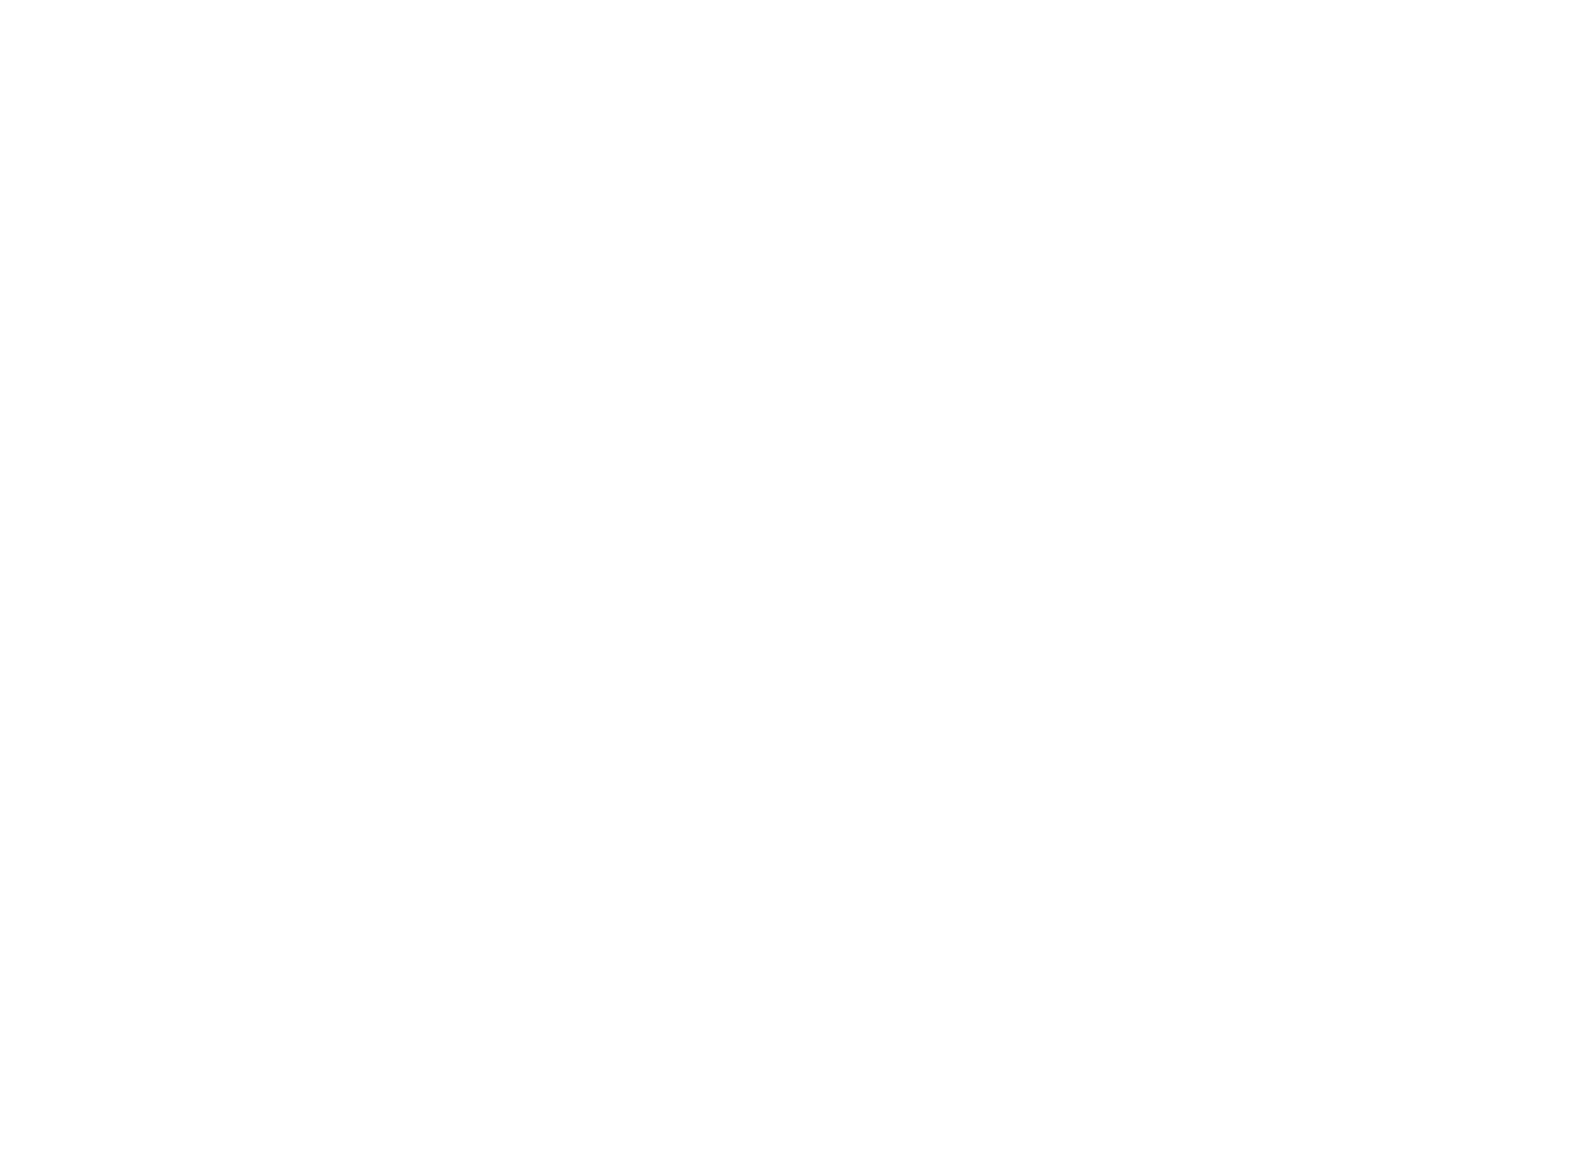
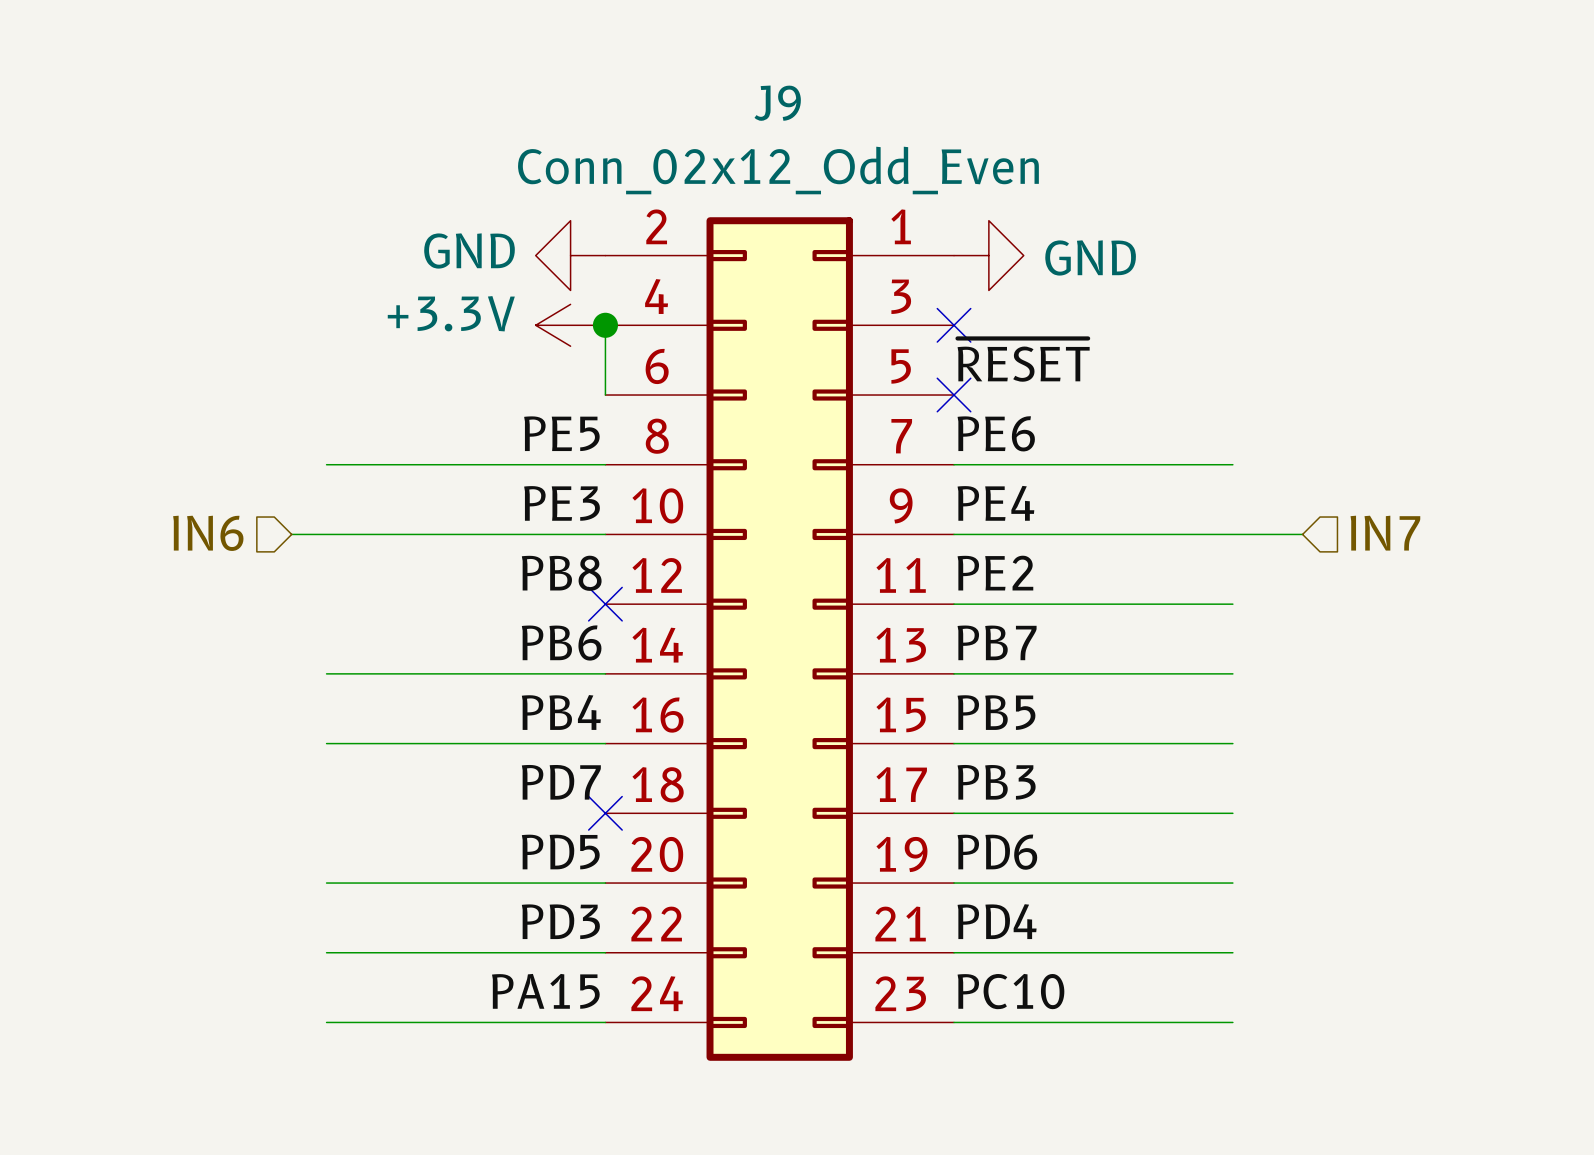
power symbol: none -> GND (570, 255)
power symbol: none -> GND (988, 255)
power symbol: none -> +3.3V (570, 325)
wire: none -> (605, 325) (605, 395)
junction: none -> (605, 325)
no-connect mark: none -> (954, 325)
label: none -> ~{RESET} (1023, 360)
no-connect mark: none -> (954, 395)
label: none -> PE5 (561, 433)
label: none -> PE6 (996, 433)
wire: none -> (326, 464) (605, 464)
wire: none -> (954, 464) (1232, 464)
label: none -> PE4 (995, 503)
label: none -> PE3 (562, 503)
hierarchical label: none -> IN6 (208, 533)
hierarchical label: none -> IN7 (1385, 533)
wire: none -> (291, 534) (605, 534)
wire: none -> (954, 534) (1302, 534)
label: none -> PB8 (561, 573)
label: none -> PE2 (995, 573)
no-connect mark: none -> (605, 604)
wire: none -> (954, 604) (1232, 604)
J9: none -> Conn_02x12_Odd_Even (779, 639)
label: none -> PB6 (561, 643)
label: none -> PB7 (997, 642)
wire: none -> (326, 673) (605, 673)
wire: none -> (954, 673) (1232, 673)
label: none -> PB4 (561, 712)
label: none -> PB5 (996, 712)
wire: none -> (326, 743) (605, 743)
wire: none -> (954, 743) (1232, 743)
label: none -> PD7 (561, 782)
label: none -> PB3 (996, 782)
no-connect mark: none -> (605, 813)
wire: none -> (954, 813) (1232, 813)
label: none -> PD5 (560, 852)
label: none -> PD6 (997, 852)
wire: none -> (326, 883) (605, 883)
wire: none -> (954, 883) (1232, 883)
label: none -> PD4 (997, 921)
label: none -> PD3 (560, 921)
wire: none -> (326, 952) (605, 952)
wire: none -> (954, 952) (1232, 952)
label: none -> PA15 (545, 991)
label: none -> PC10 (1010, 991)
wire: none -> (326, 1022) (605, 1022)
wire: none -> (954, 1022) (1232, 1022)

